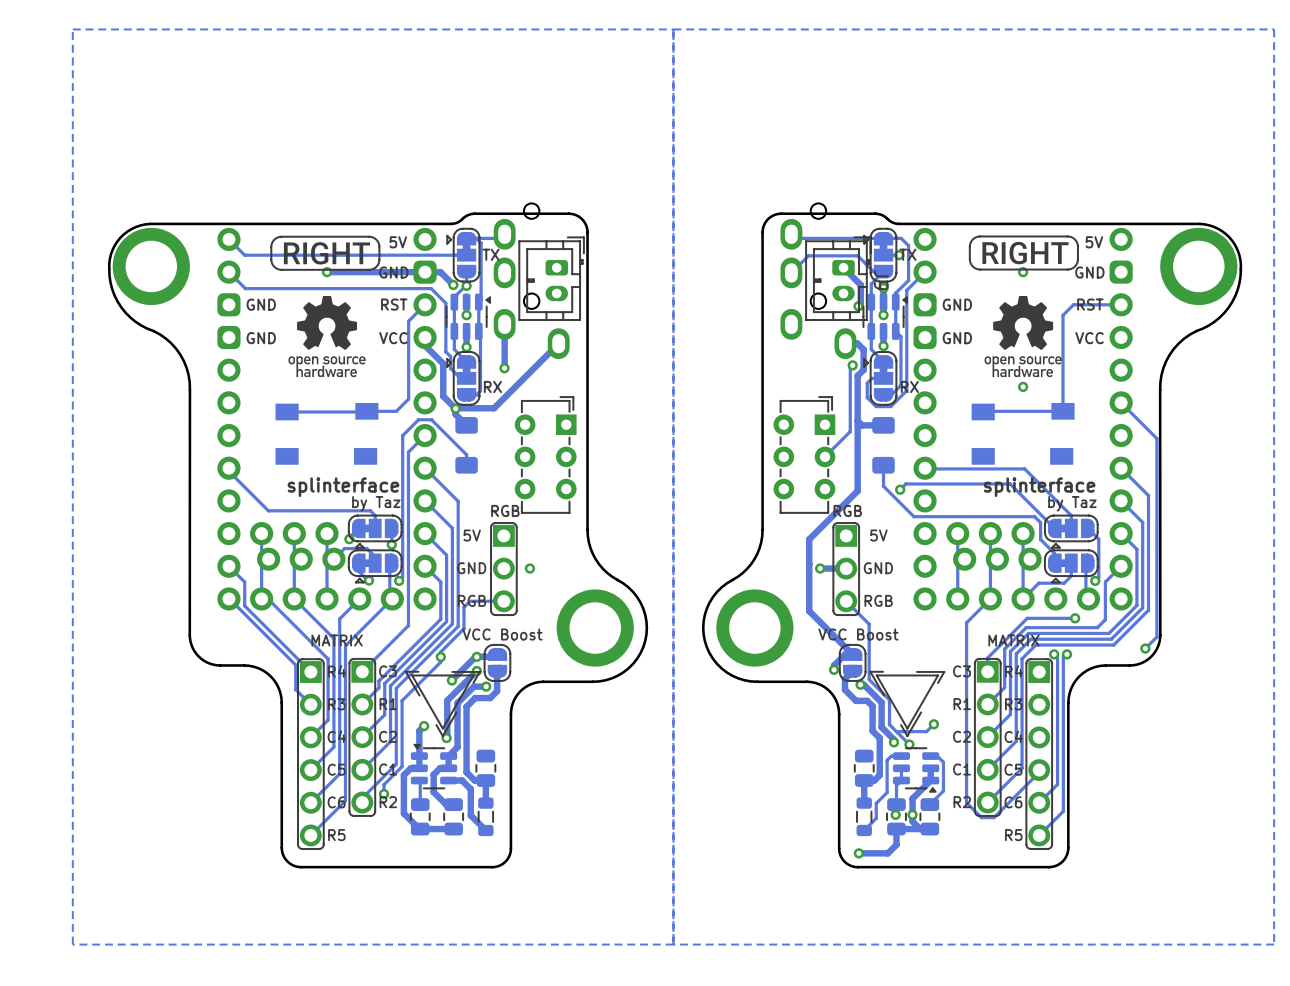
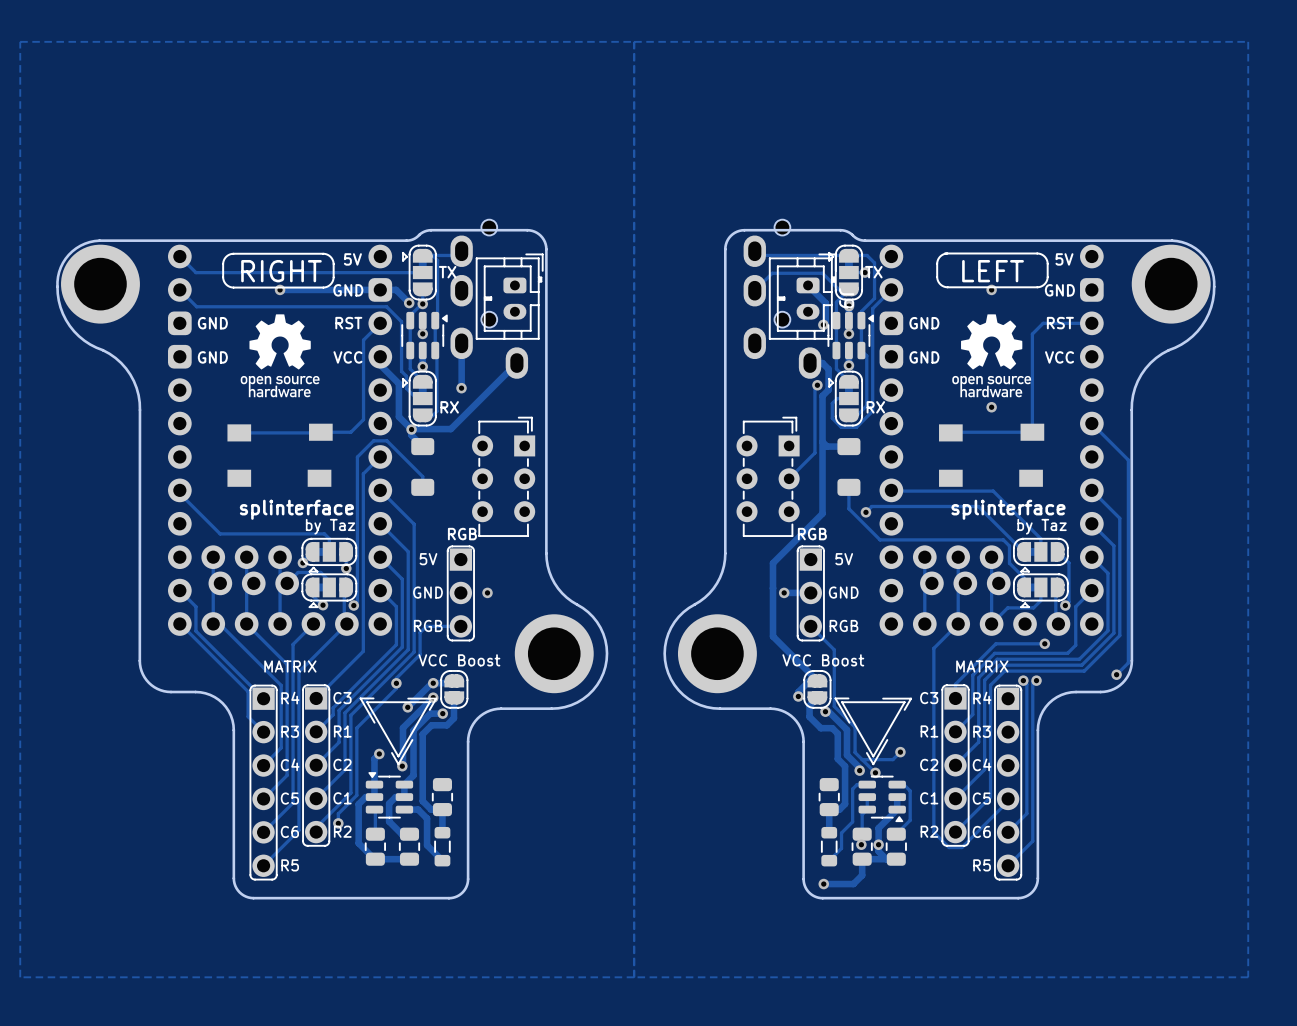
drawing: [982, 241, 1069, 265] -> none
drawing: [283, 242, 371, 265] -> none
text: none -> RIGHT (281, 271)
text: none -> LEFT (993, 271)

